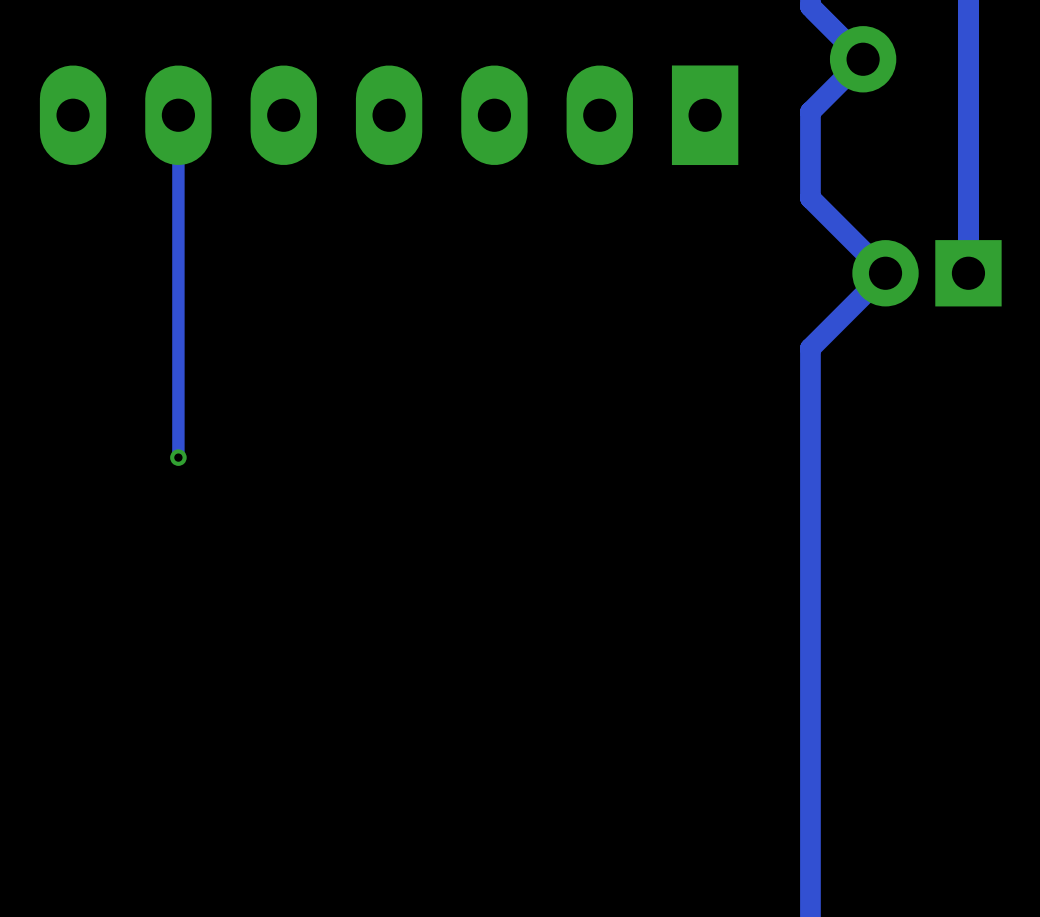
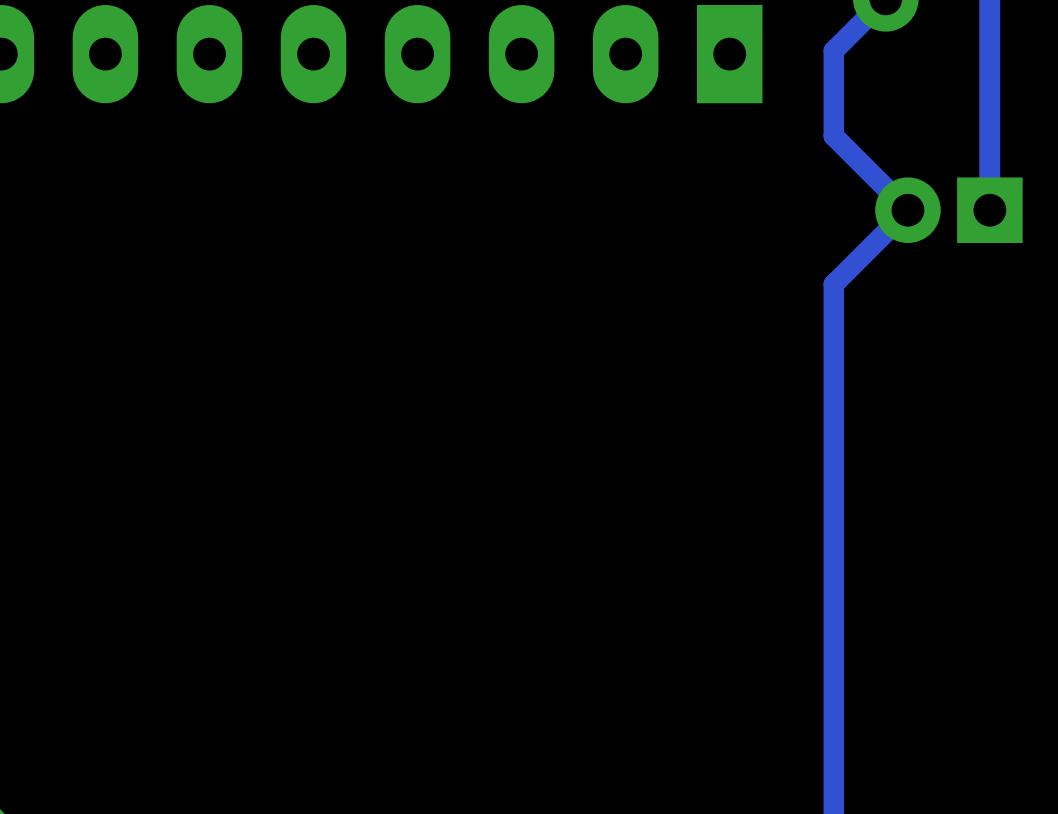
track: (178, 115) (178, 457) -> none
via: (178, 457) -> none

